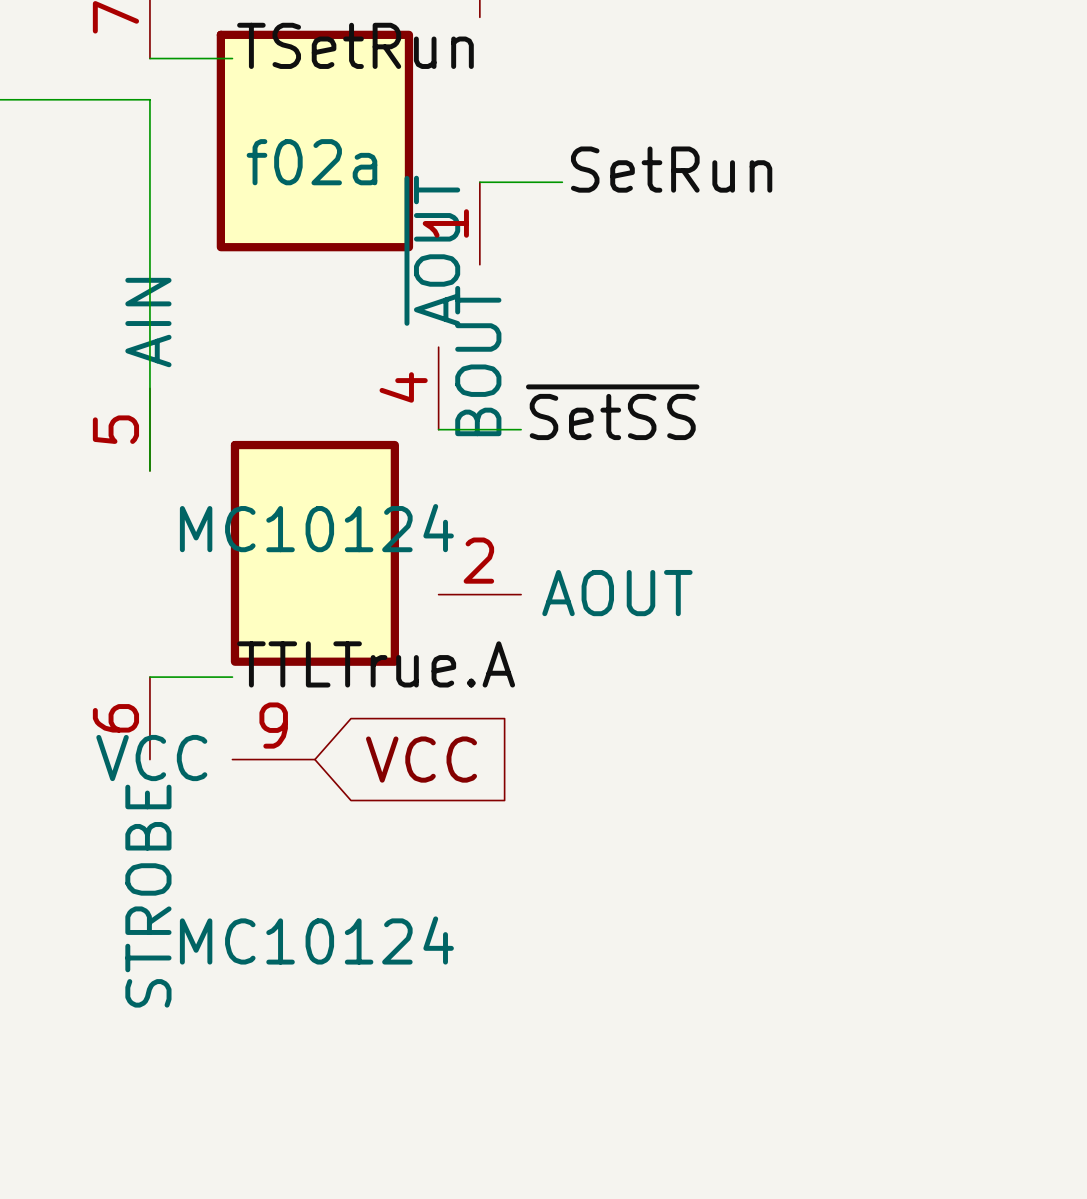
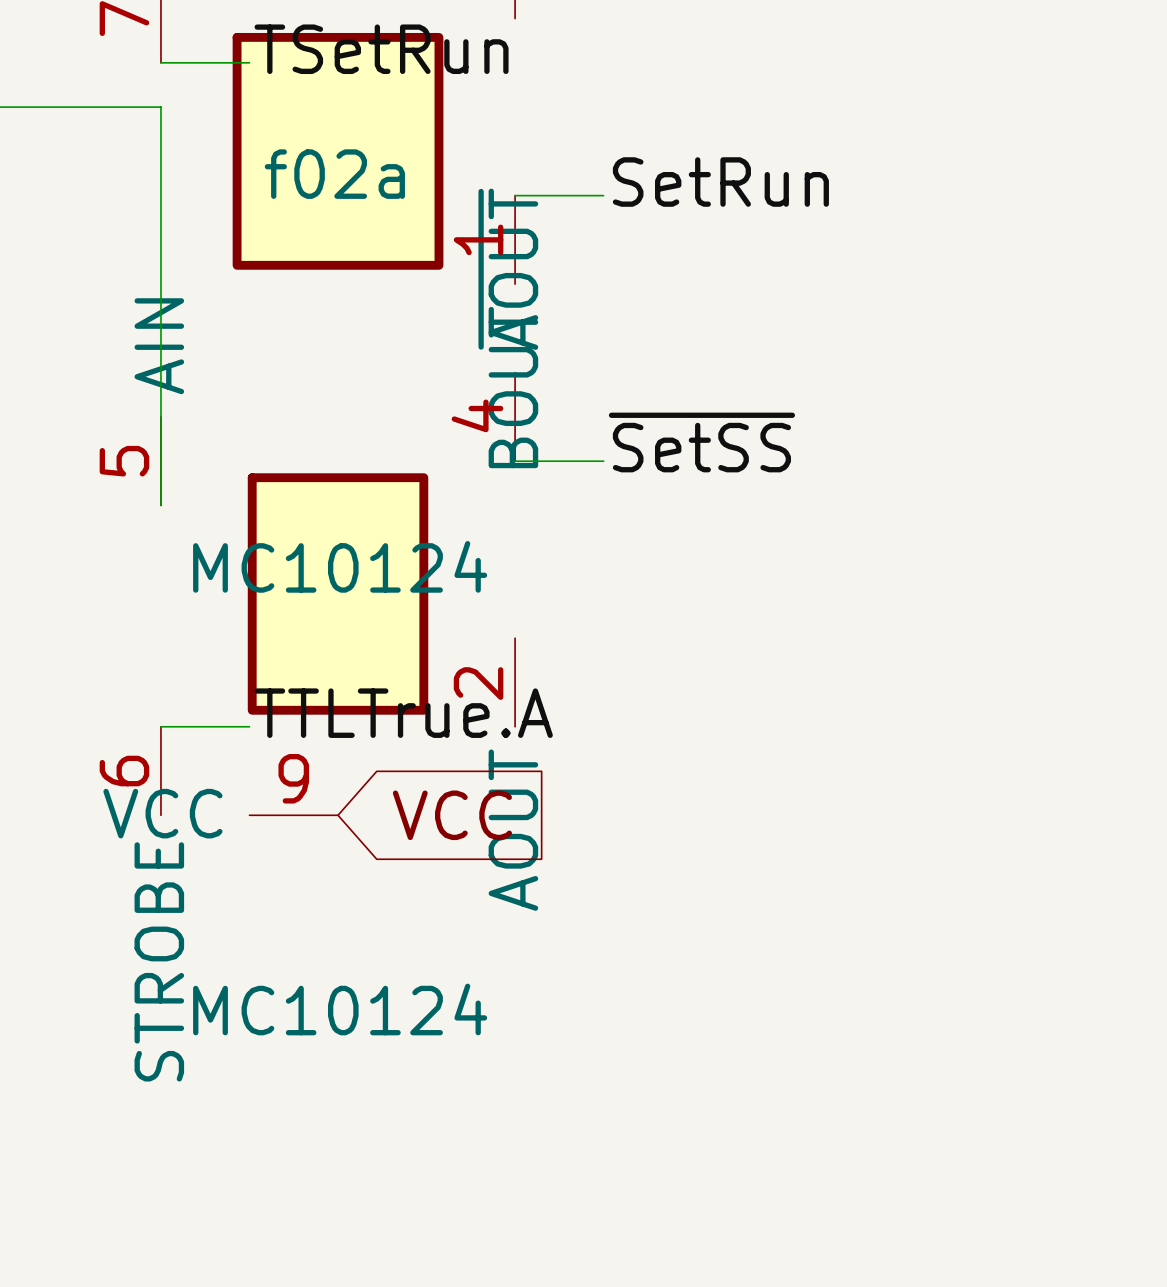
f02a symbol: [149, 347, 522, 760] -> [160, 372, 516, 816]
label position: ~{SetSS} (612, 412) -> ~{SetSS} (701, 442)
wire: (438, 429) (479, 429) -> (559, 461) (603, 461)

